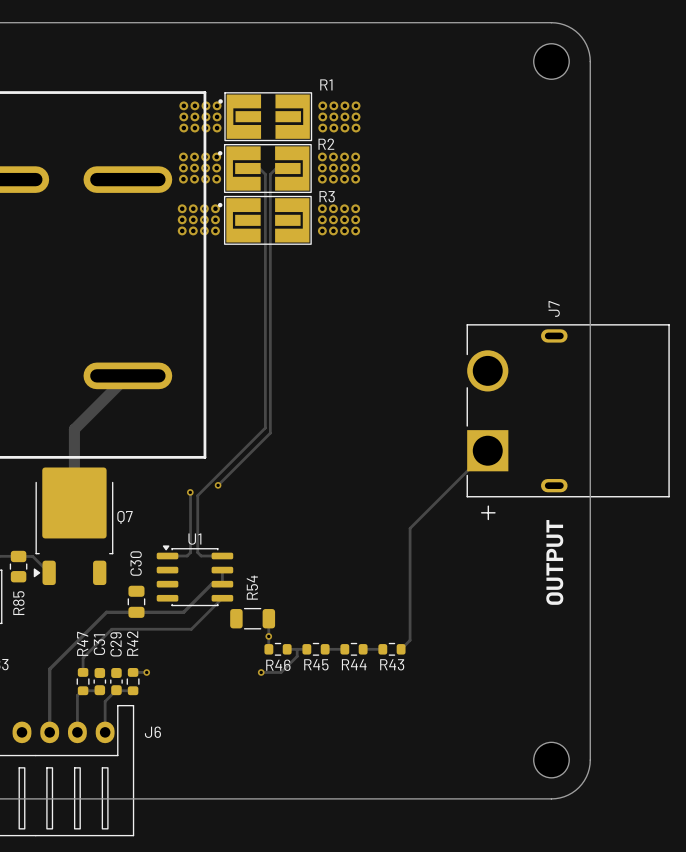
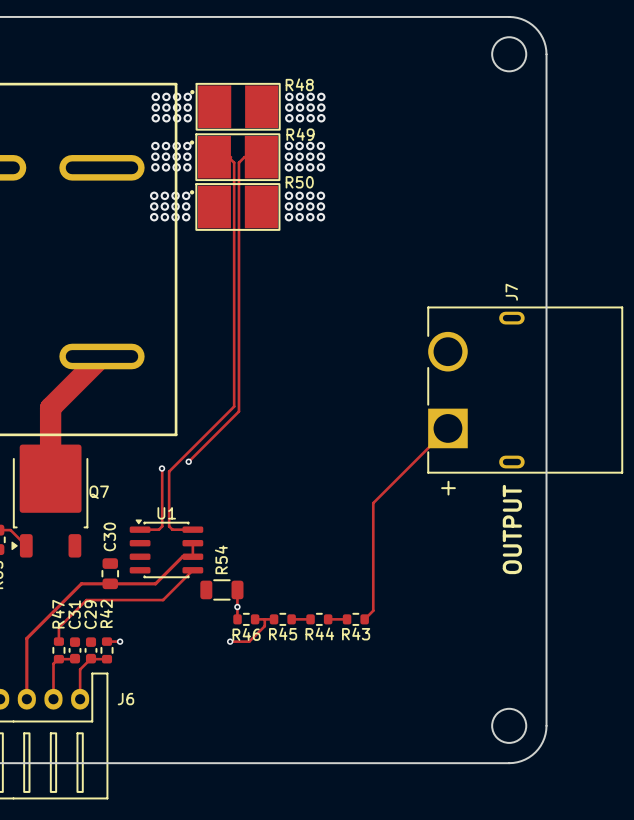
R1: (265, 116) -> none
R48: none -> (235, 106)
R2: (264, 168) -> none
R49: none -> (234, 157)
R3: (264, 220) -> none
R50: none -> (235, 206)
track width: thin (127, 375) (74, 429) (74, 502) -> thick (101, 356) (50, 407) (50, 478)

